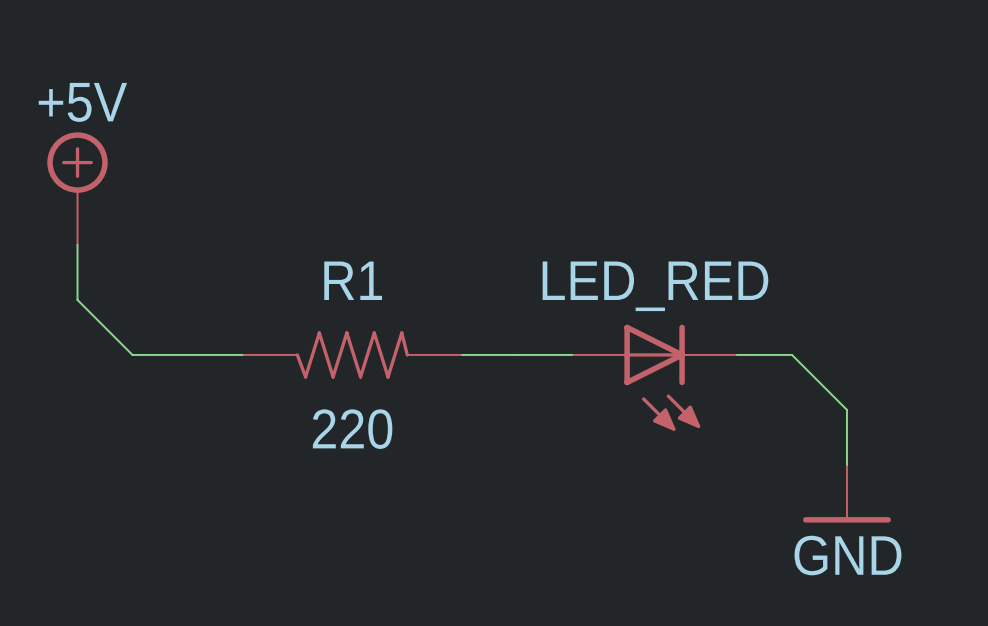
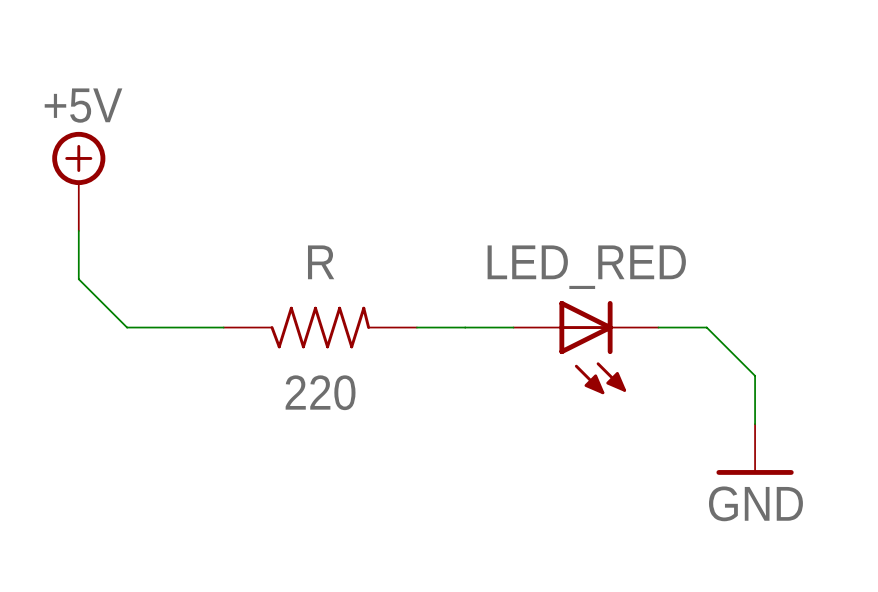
R1 name: R1 (353, 280) -> R (321, 262)

